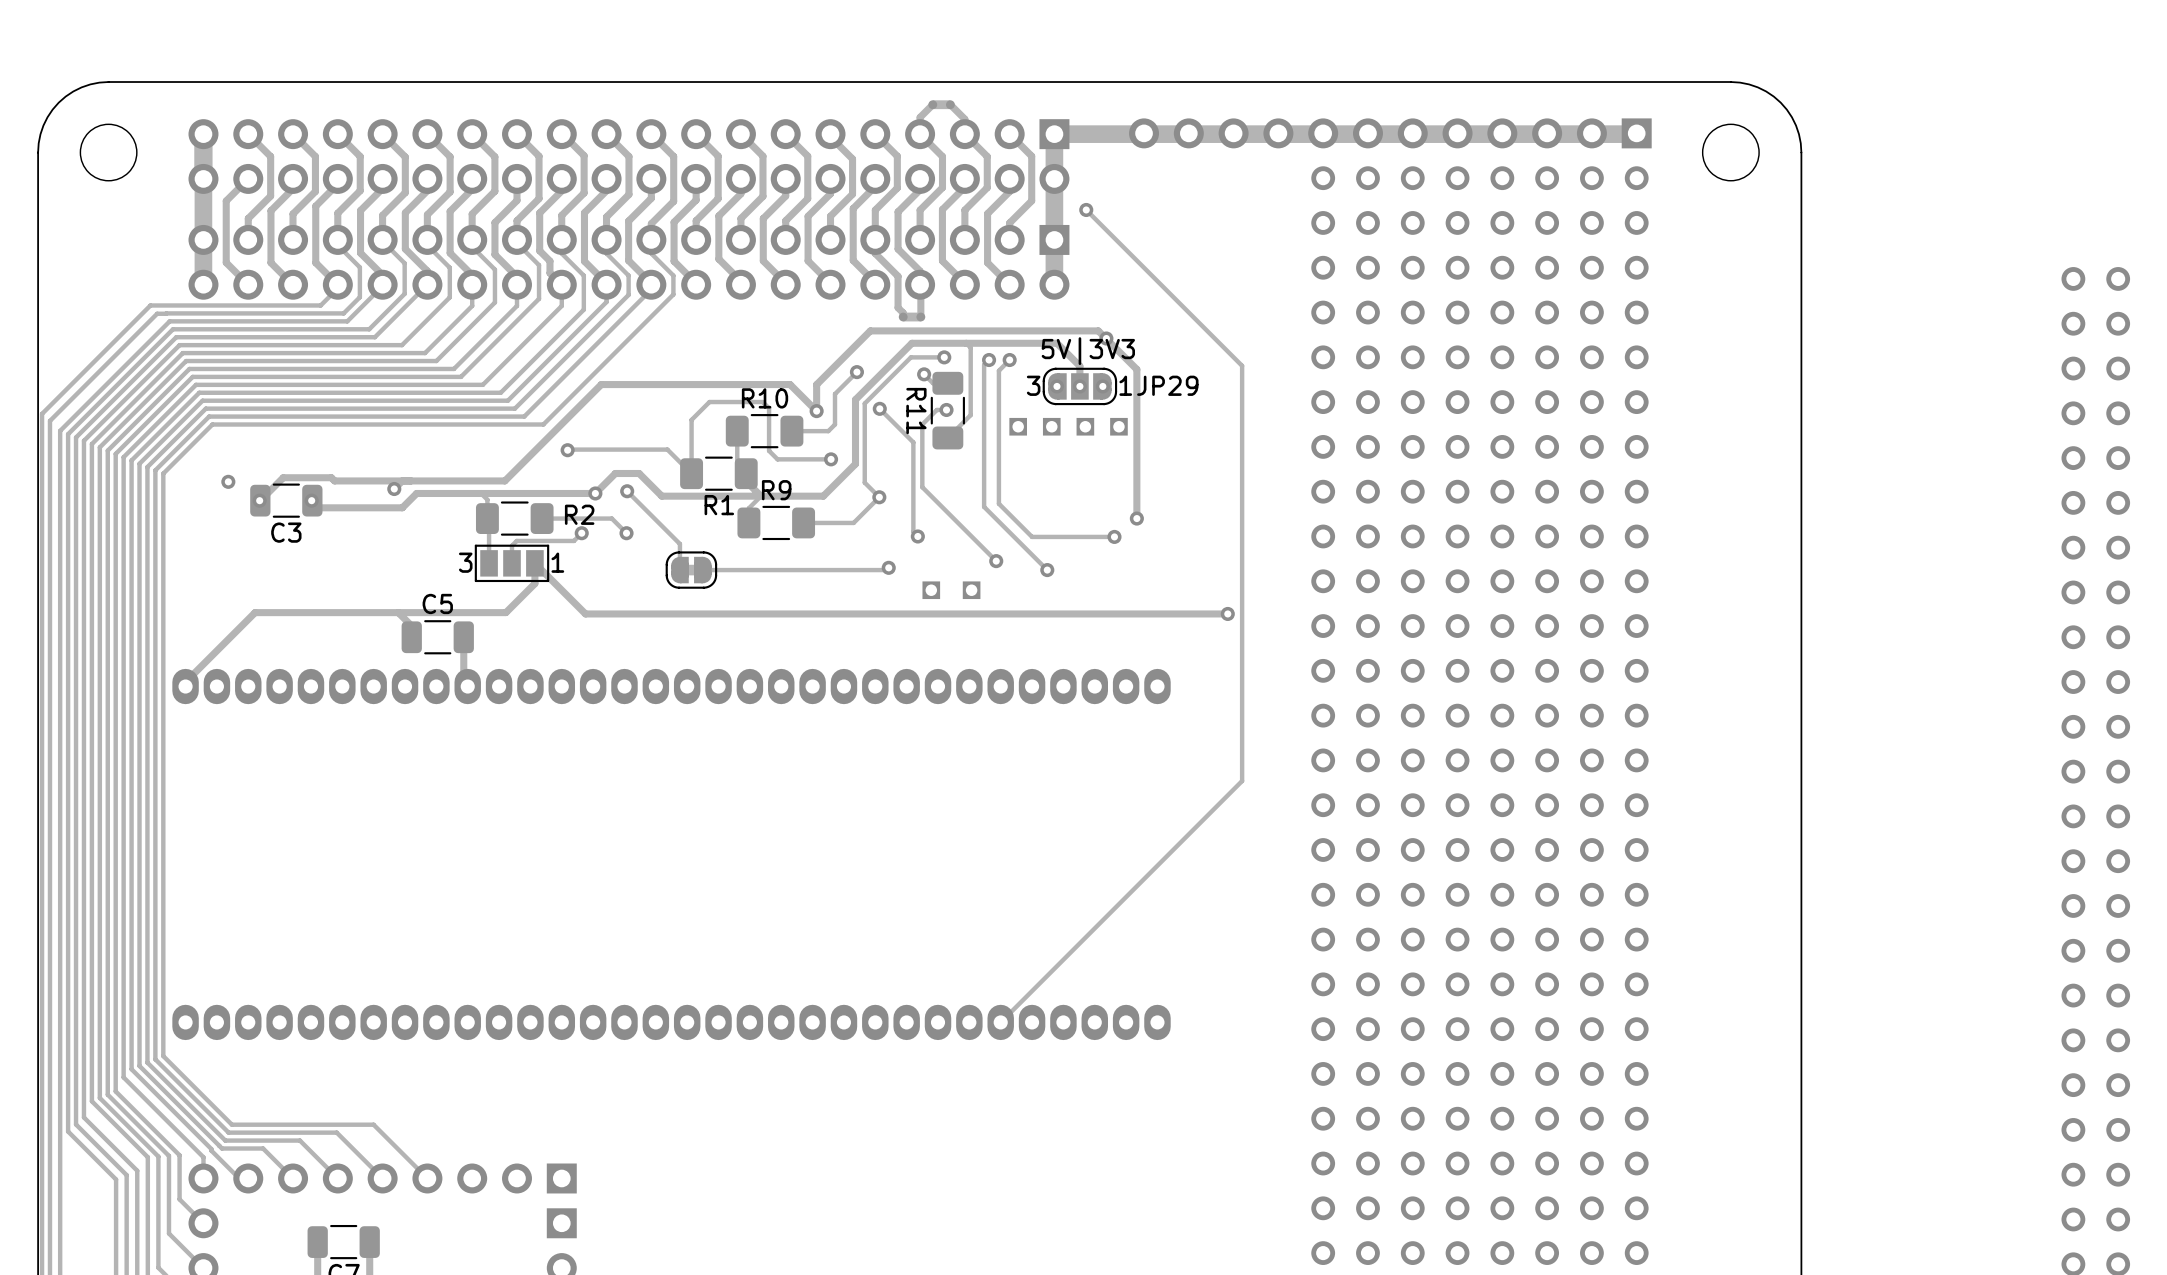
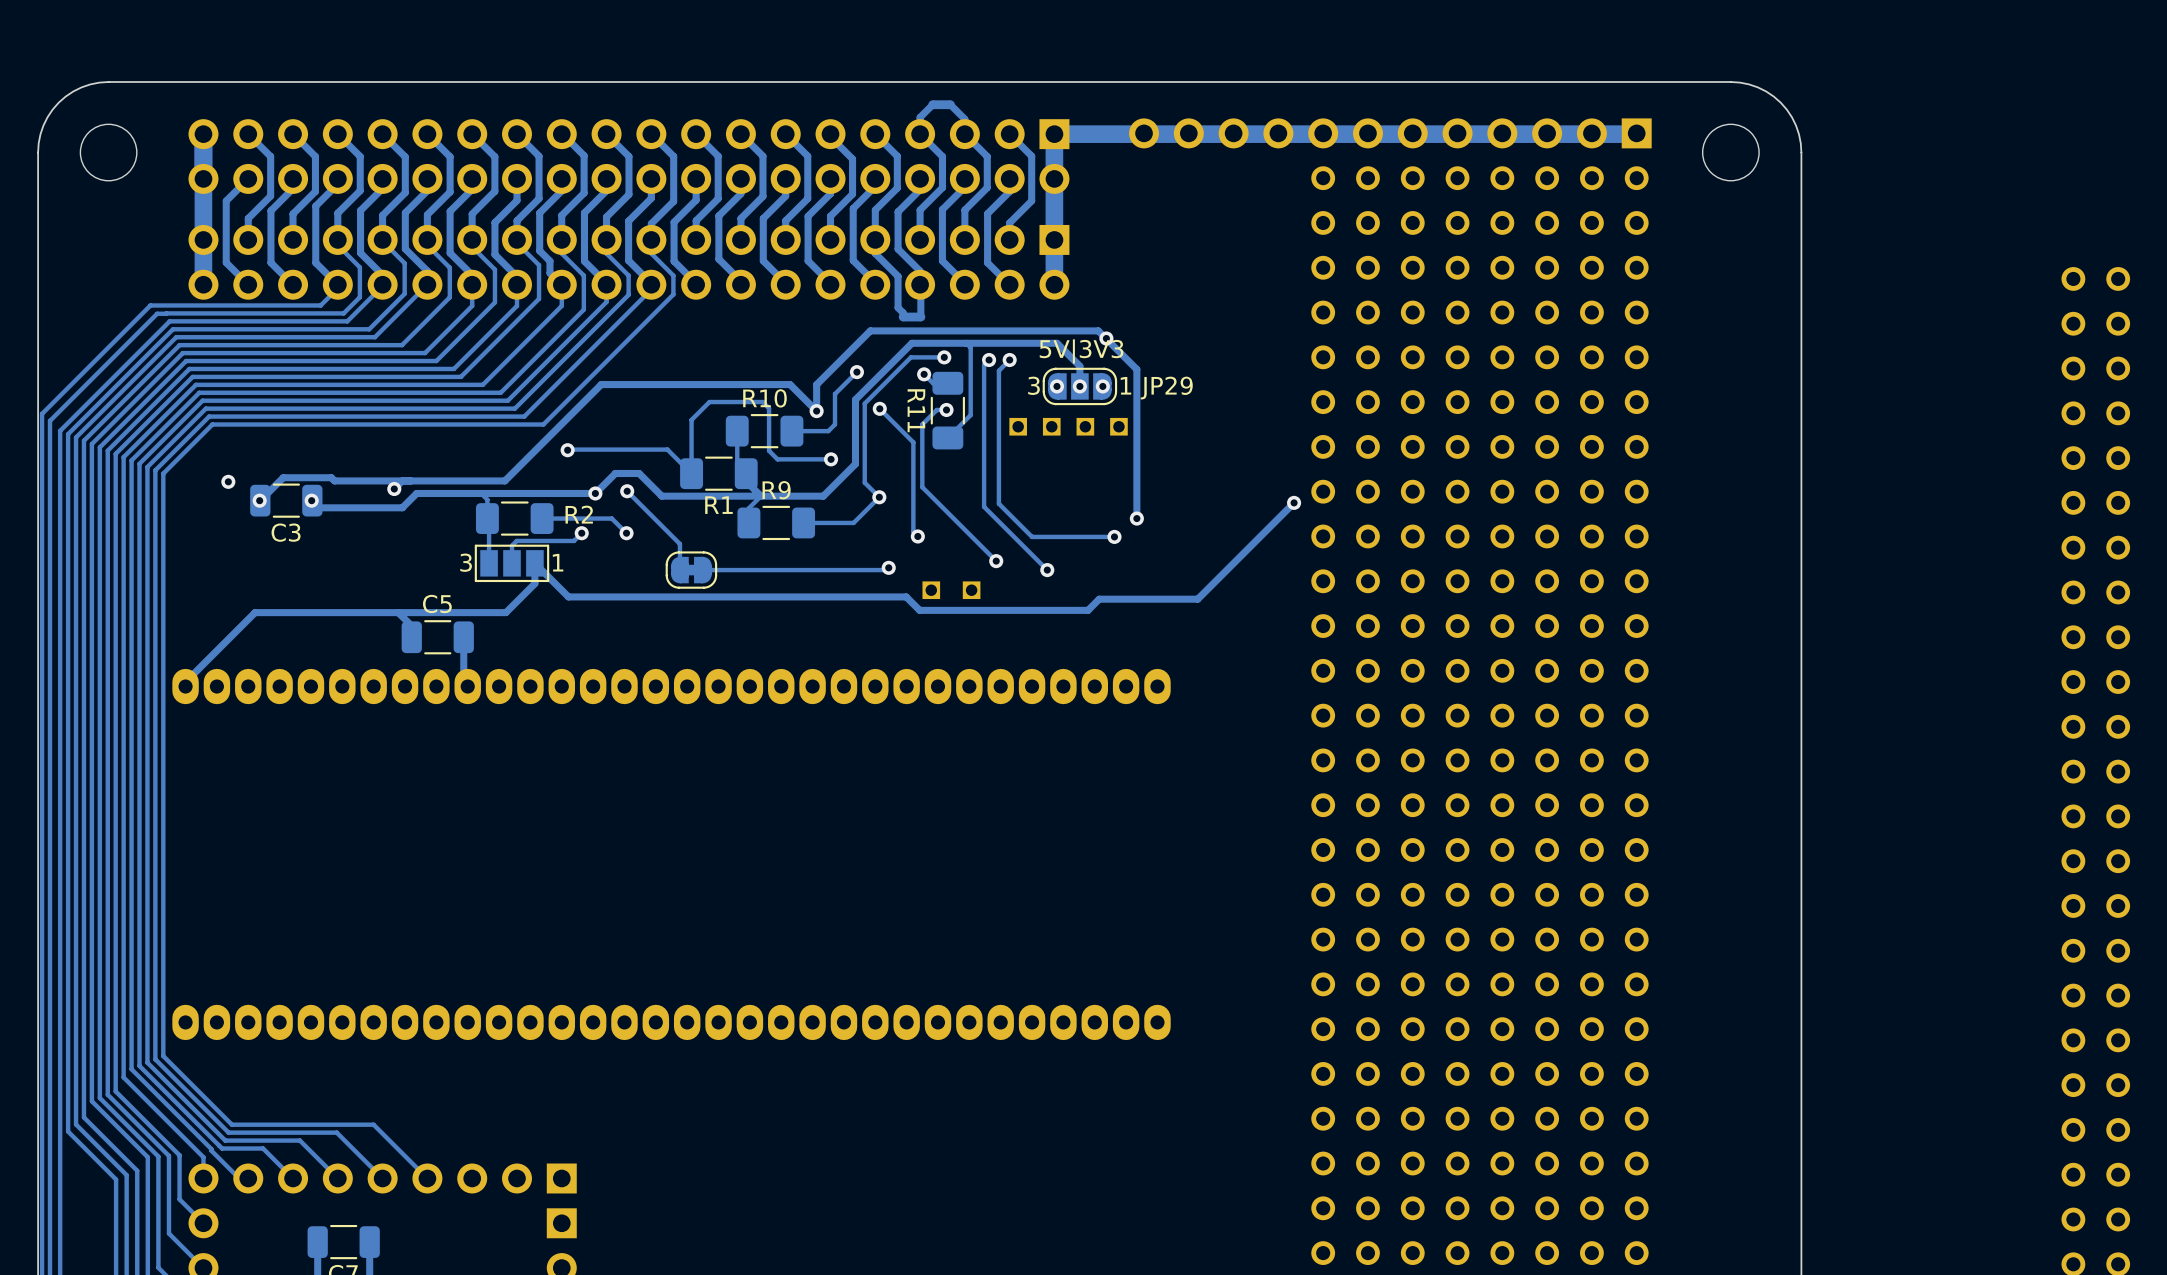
track: (1086, 209) (1242, 365) (1242, 781) (1000, 1022) -> none
via: (1086, 209) -> none
via: none -> (1294, 502)
track: (568, 596) (585, 613) (1227, 613) -> (568, 596) (906, 596) (919, 610) (1088, 610) (1099, 599) (1197, 599) (1294, 502)
via: (1227, 613) -> none

